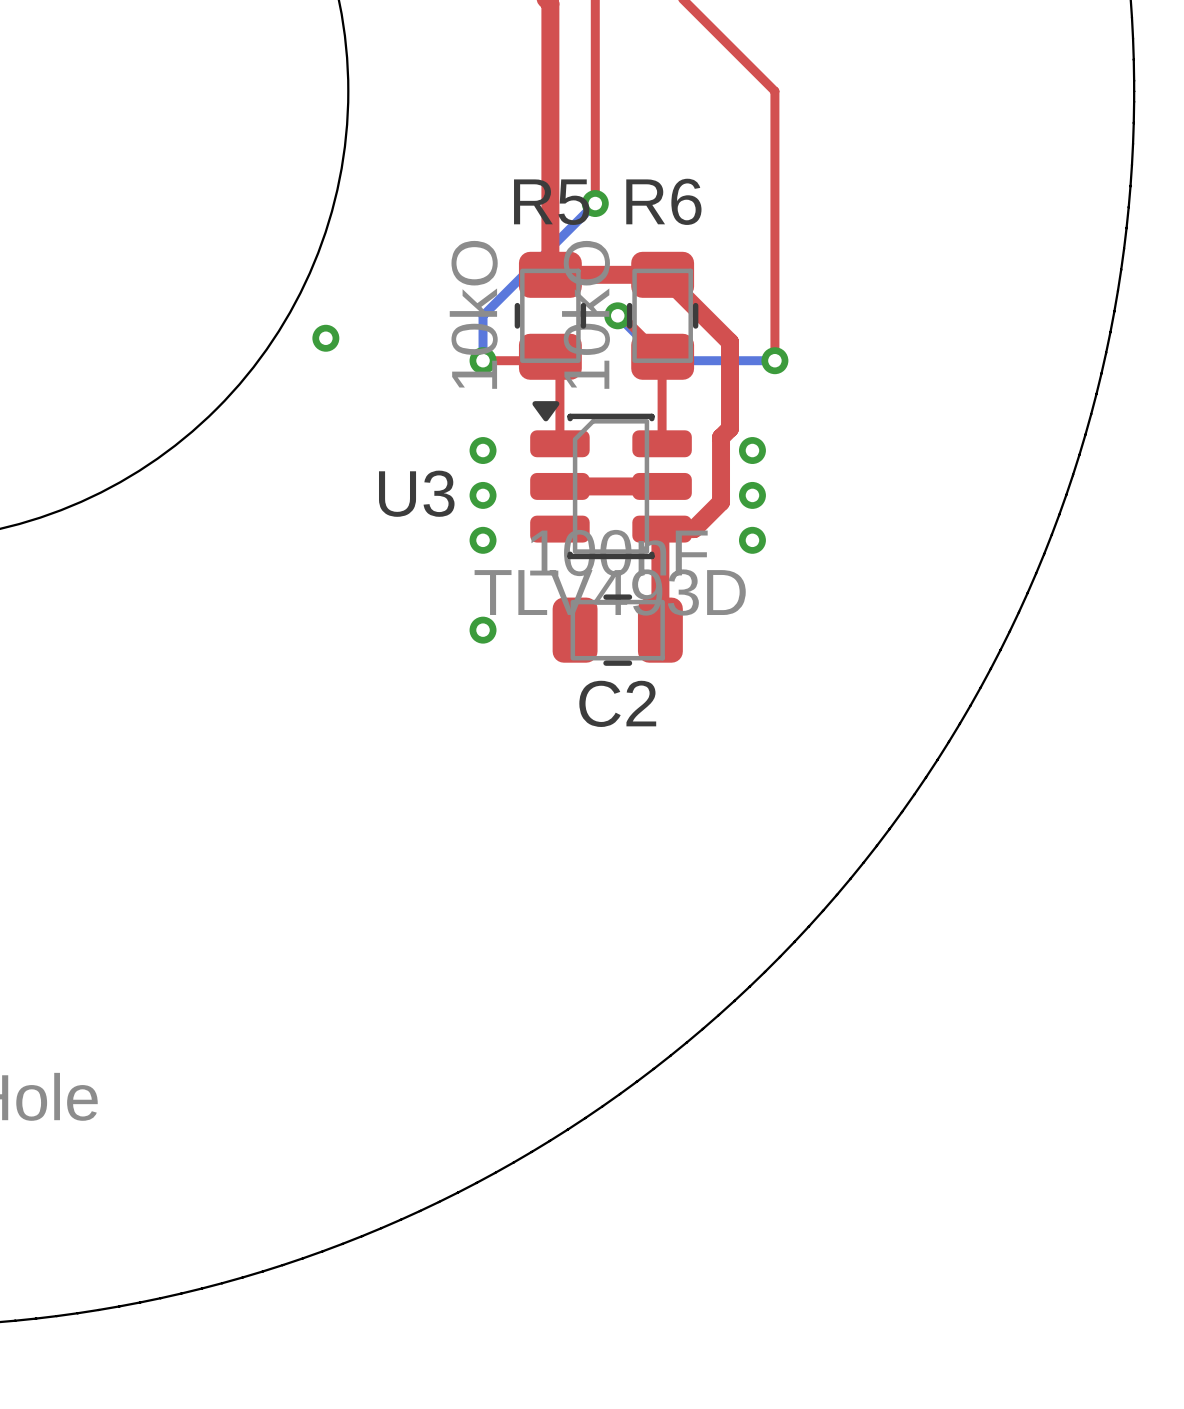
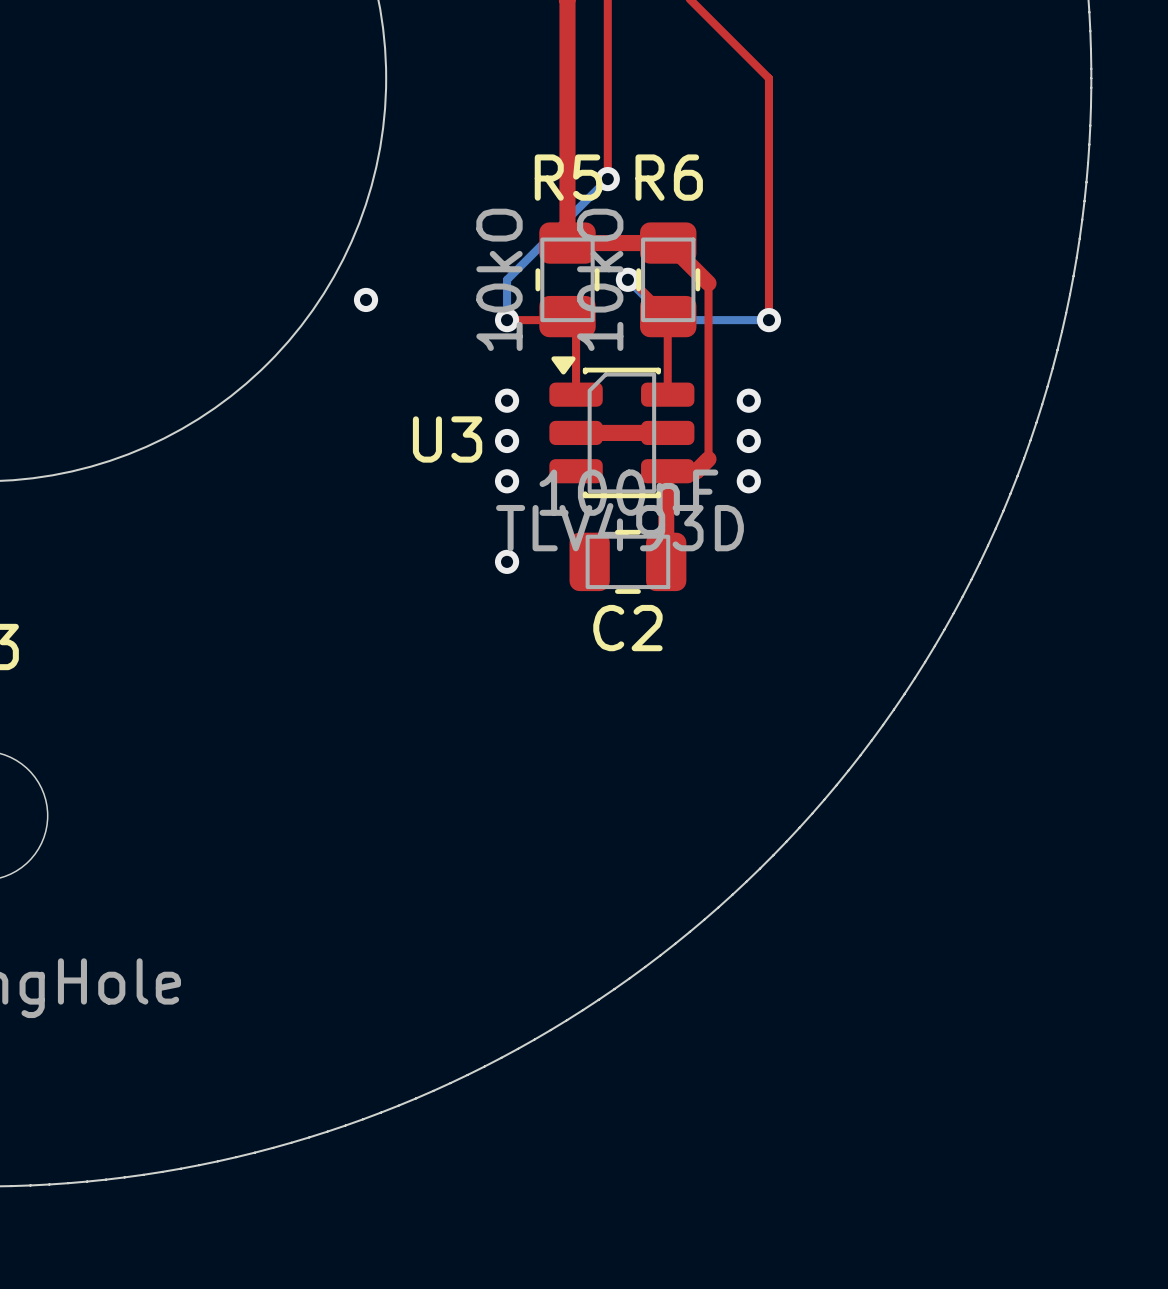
top track: (707, 319) (730, 342) (730, 428) (721, 437) (721, 502) (707, 515) -> (708, 283) (708, 459)

